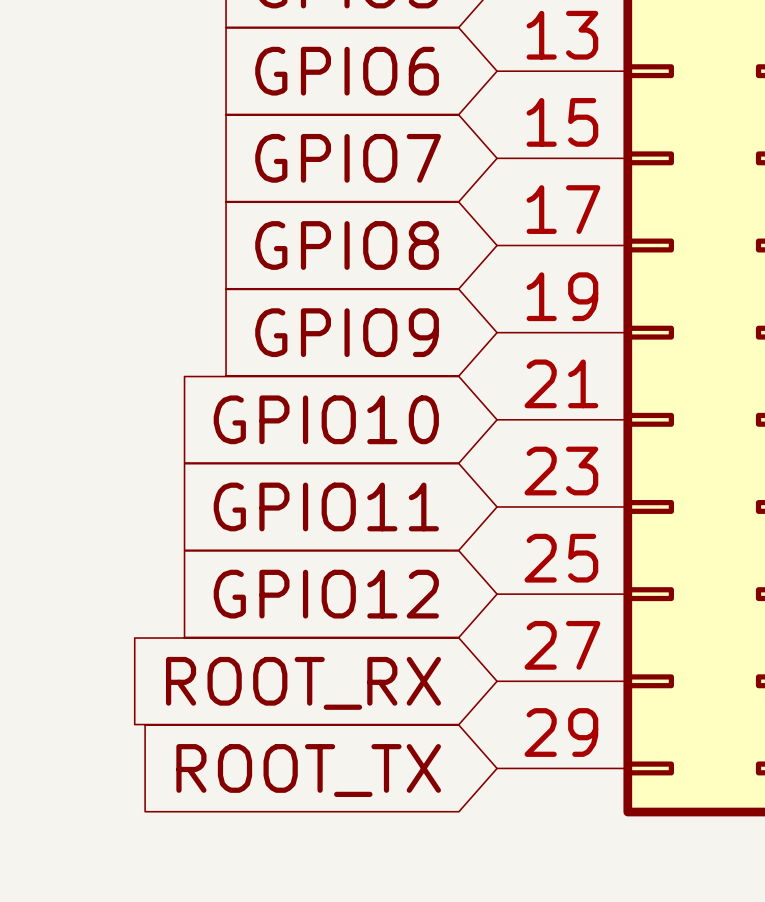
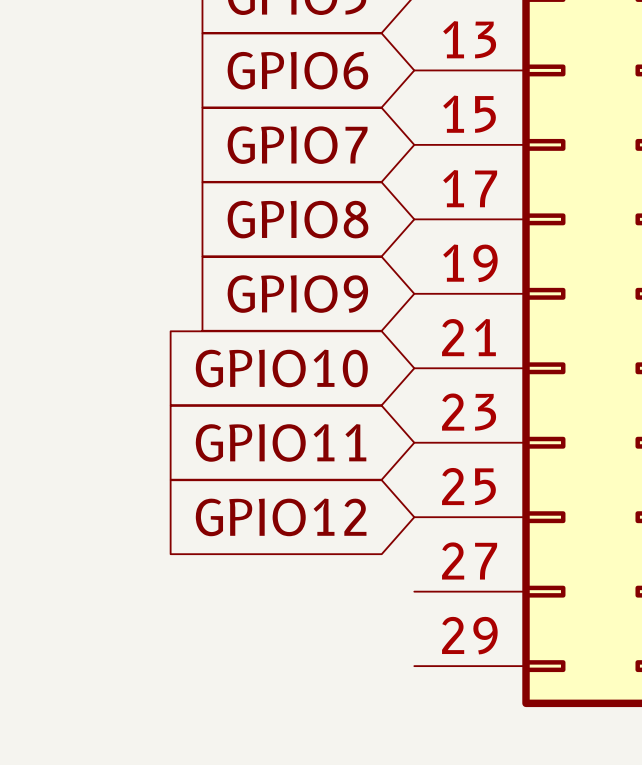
global label: ROOT_RX (303, 683) -> none
global label: ROOT_TX (308, 770) -> none

